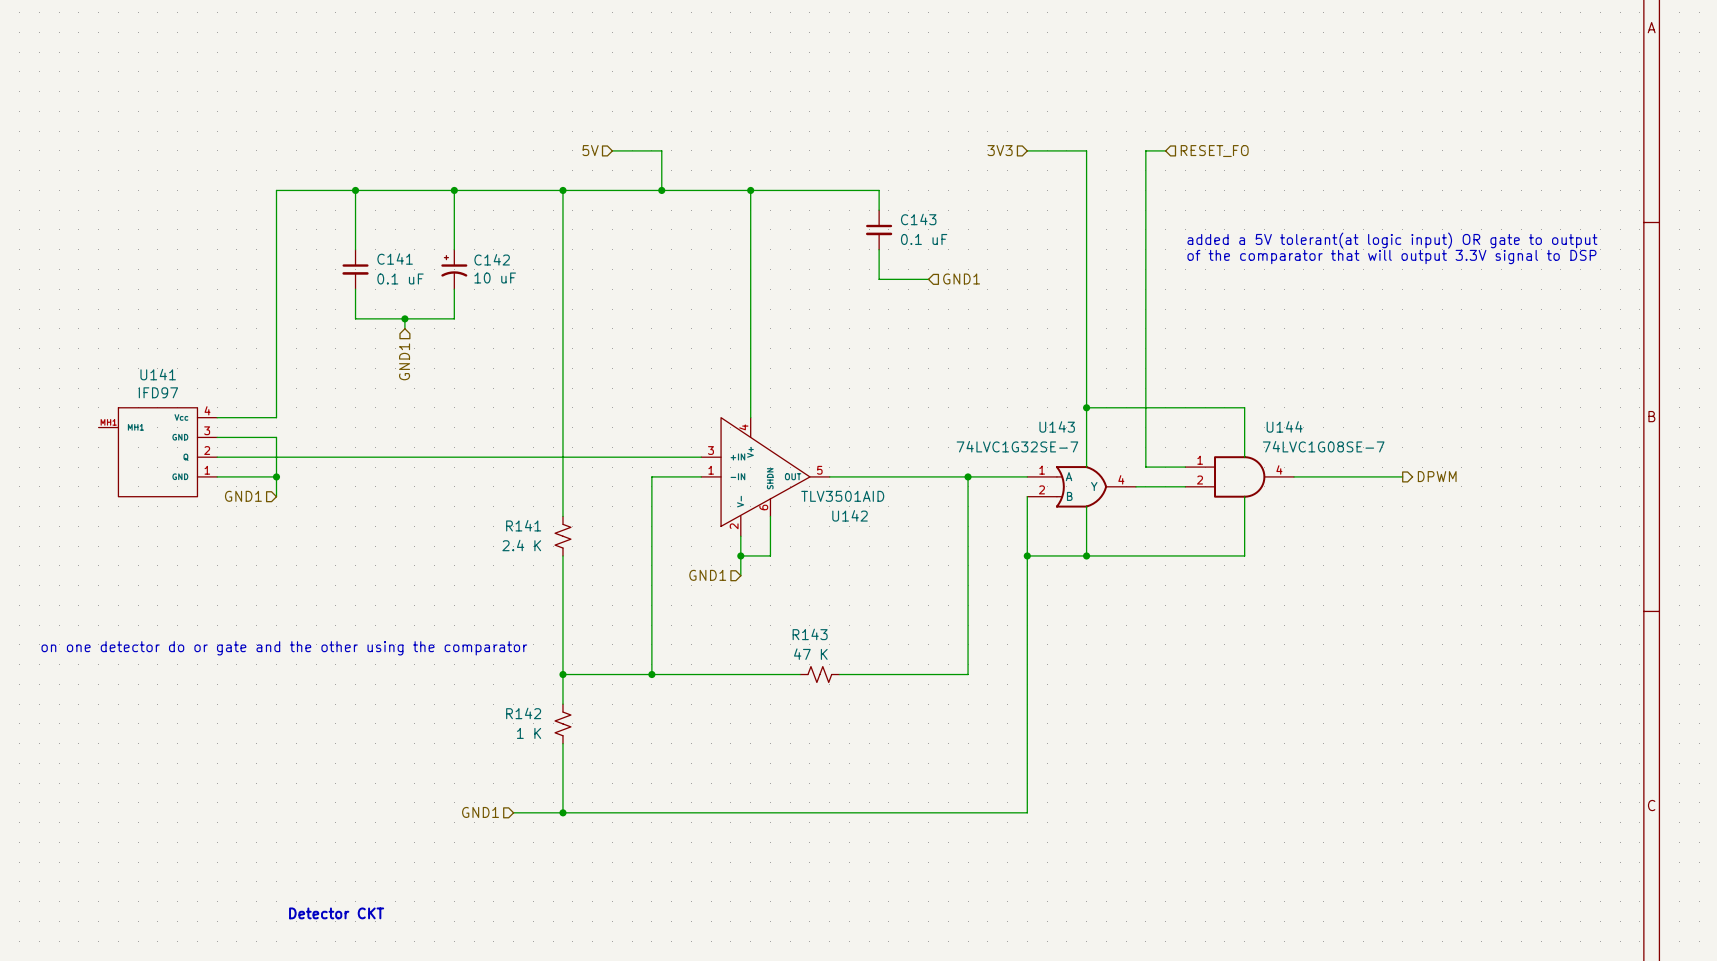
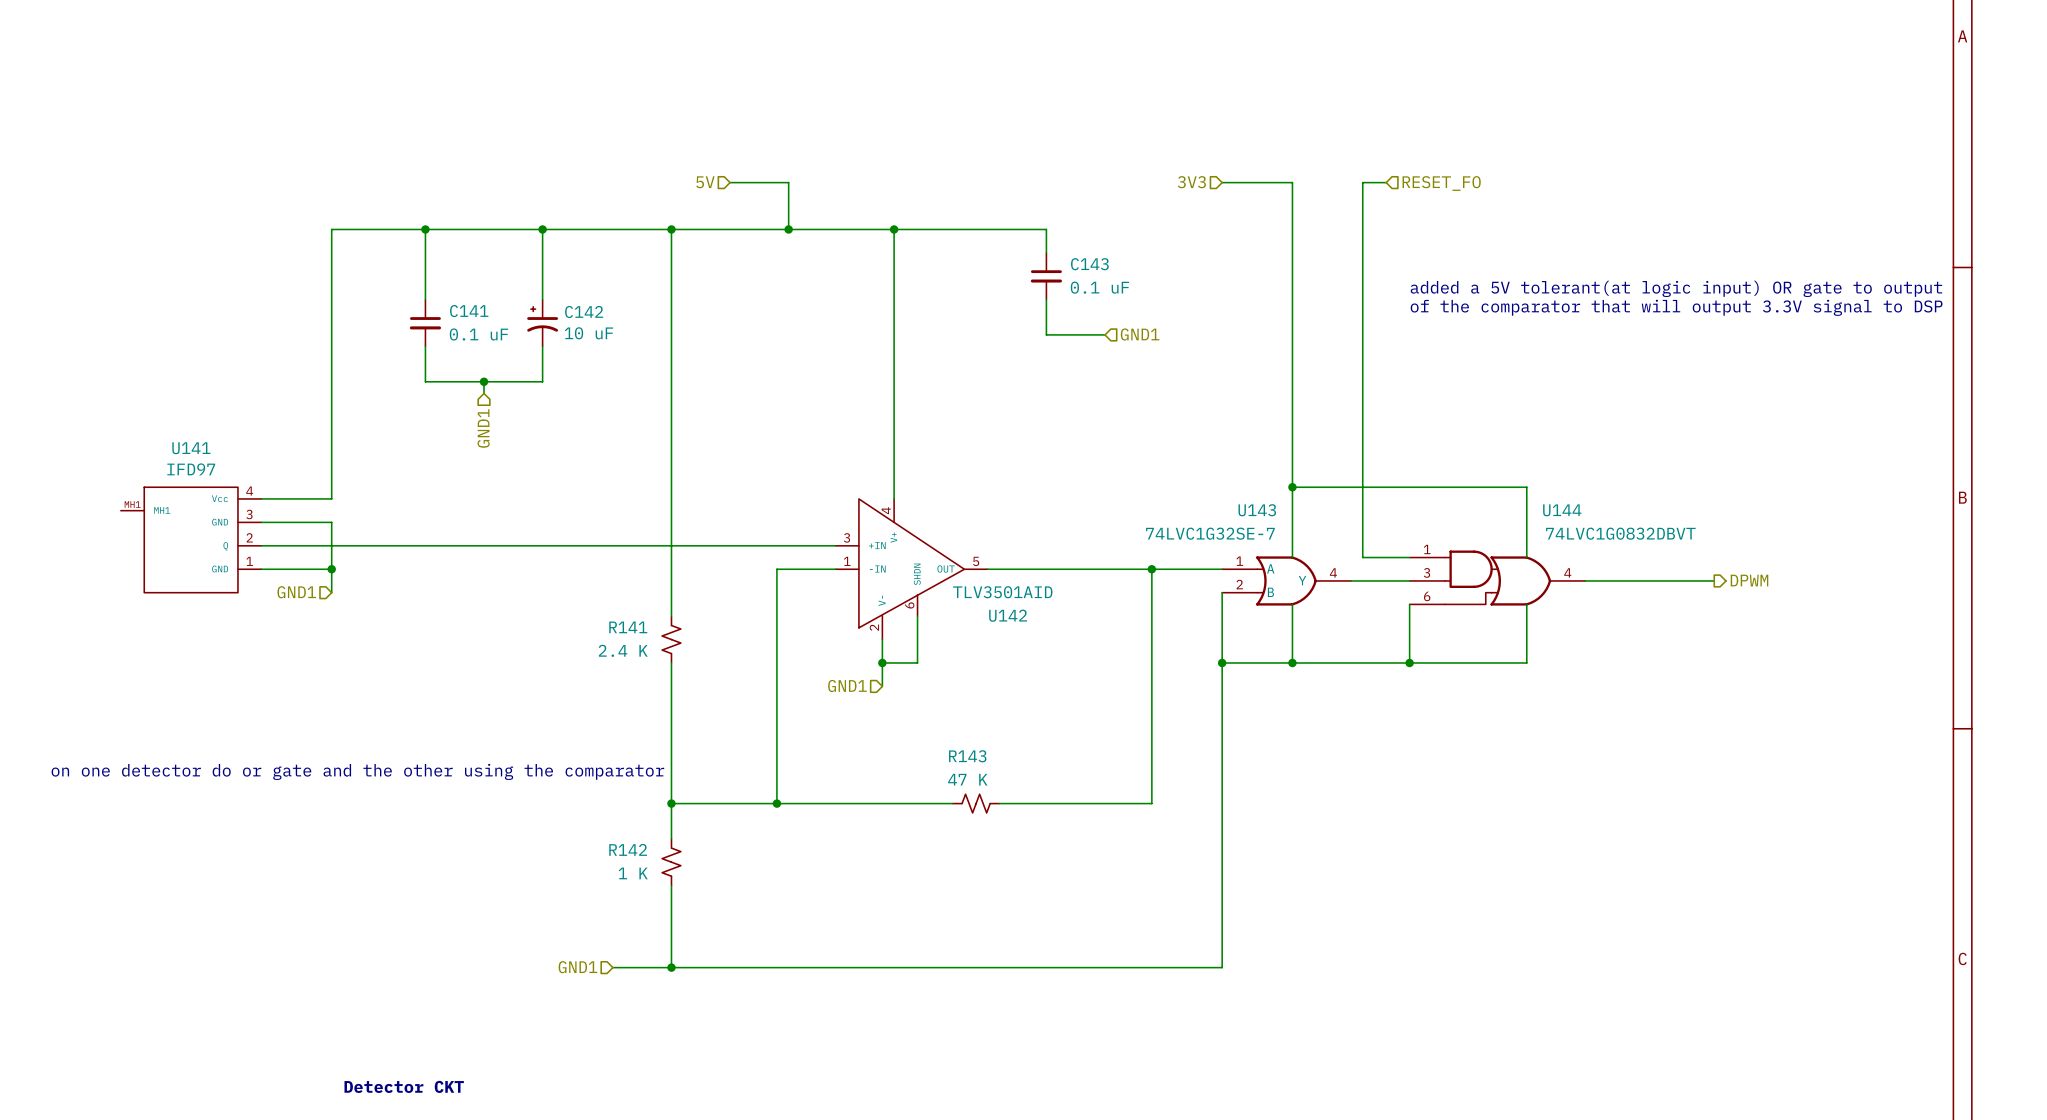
wire: (1244, 407) (1244, 457) -> (1479, 487) (1526, 487) (1526, 557)
U144 value: 74LVC1G08SE-7 (1323, 446) -> 74LVC1G0832DBVT (1620, 533)
U144 symbol: [1185, 456, 1295, 498] -> [1409, 550, 1586, 606]
wire: (1294, 476) (1402, 476) -> (1585, 580) (1714, 580)
hierarchical label position: DPWM (1437, 476) -> DPWM (1749, 580)
wire: (1244, 496) (1244, 555) -> (1526, 604) (1526, 662) (1479, 662)
wire: none -> (1409, 604) (1409, 662)
junction: none -> (1409, 662)

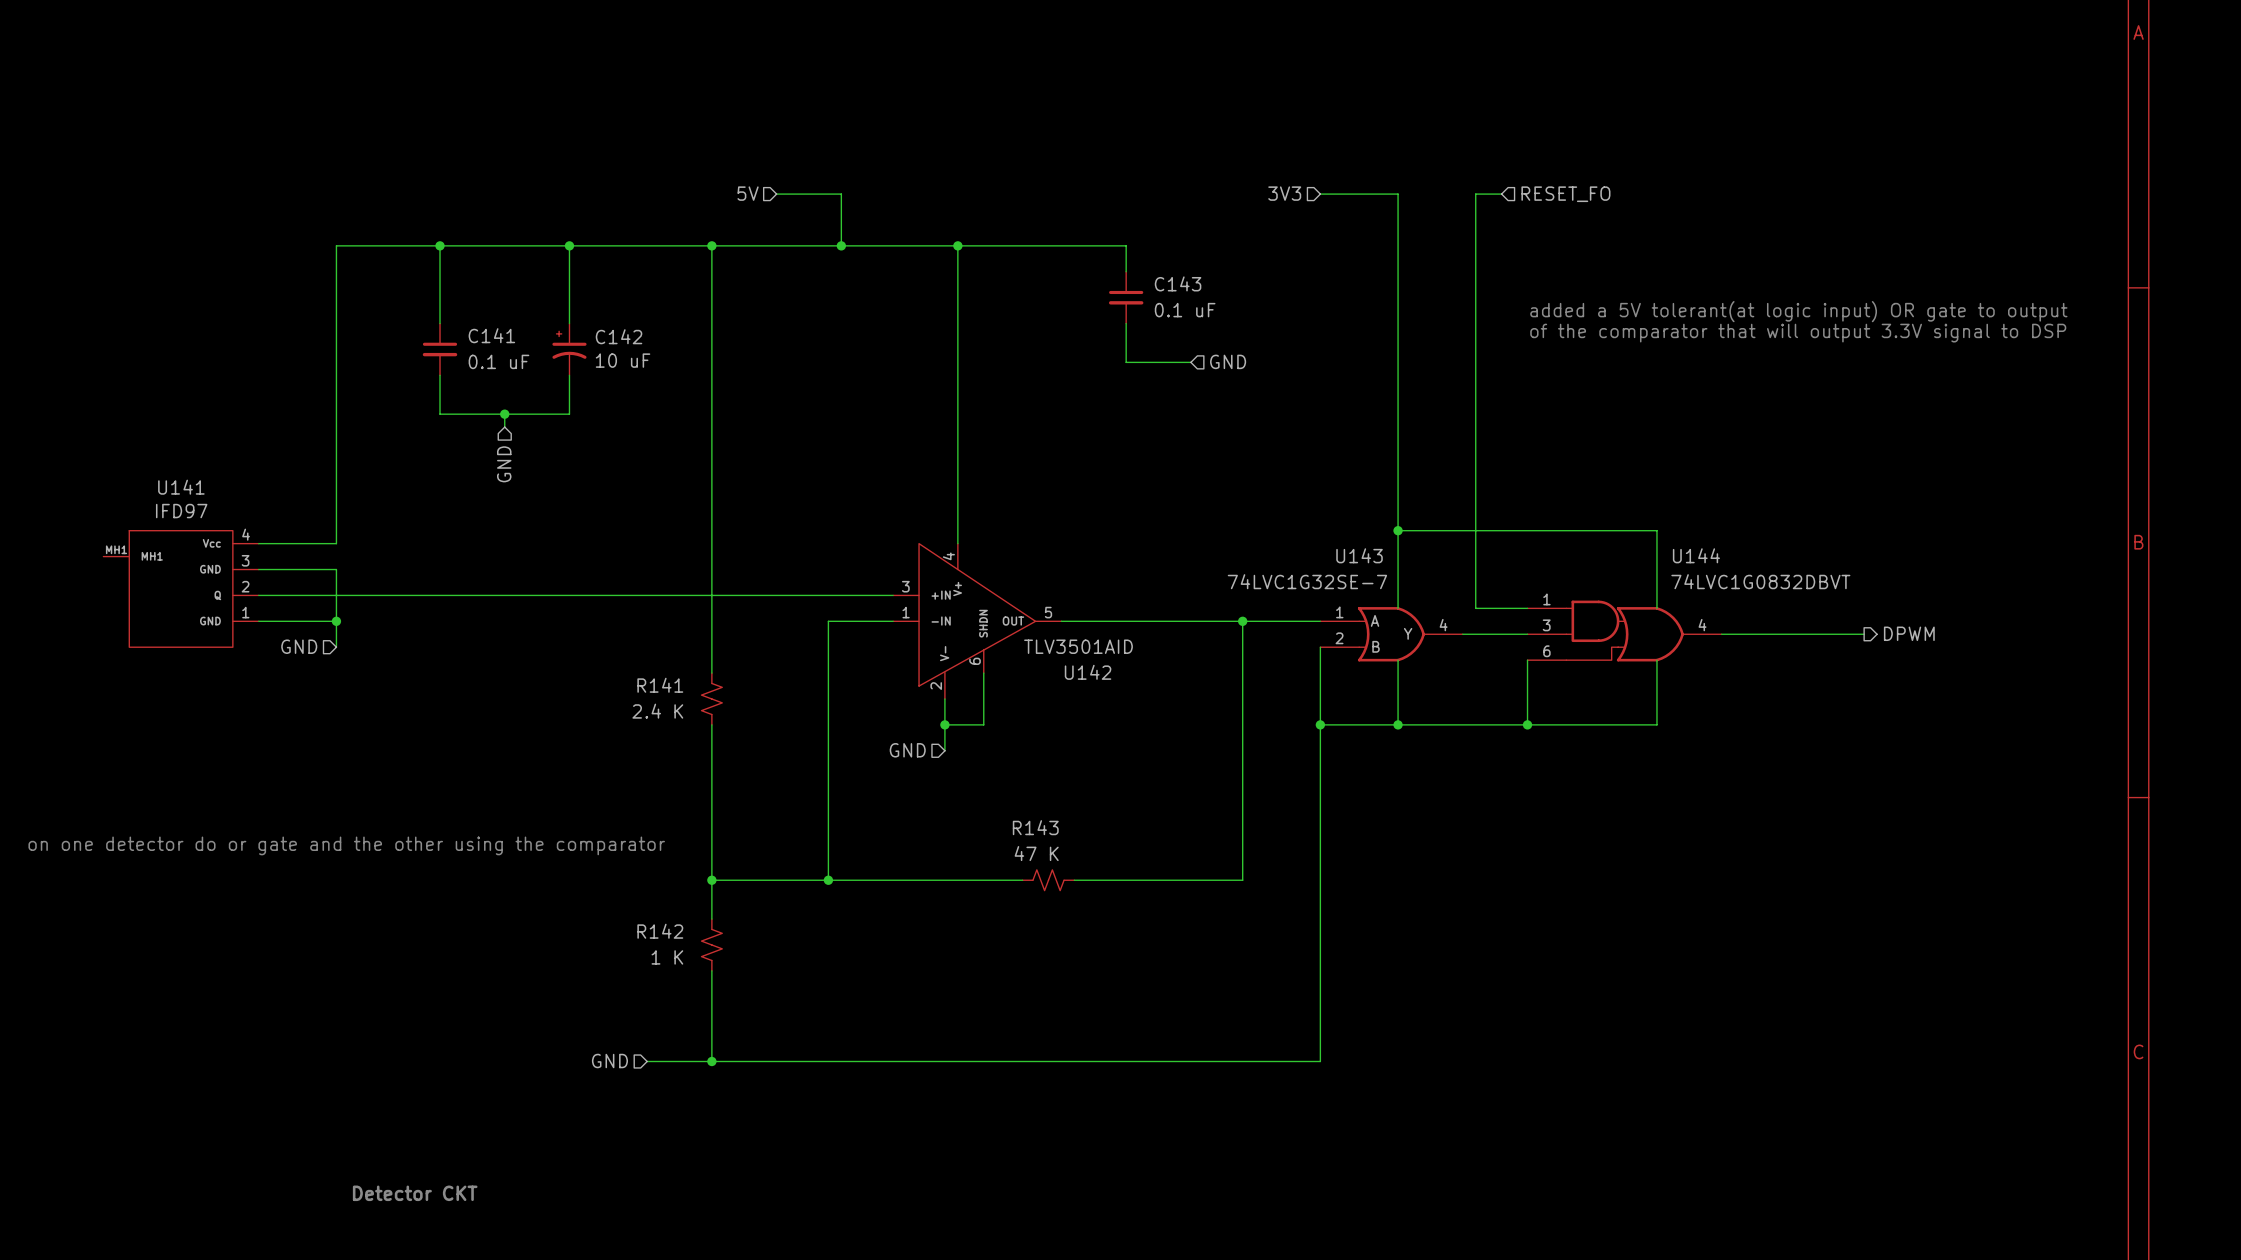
hierarchical label: GND1 (1140, 334) -> GND (1228, 361)
hierarchical label: GND1 (483, 428) -> GND (504, 464)
hierarchical label: GND1 (296, 592) -> GND (299, 646)
hierarchical label: GND1 (847, 685) -> GND (907, 750)
hierarchical label: GND1 (577, 967) -> GND (609, 1061)

